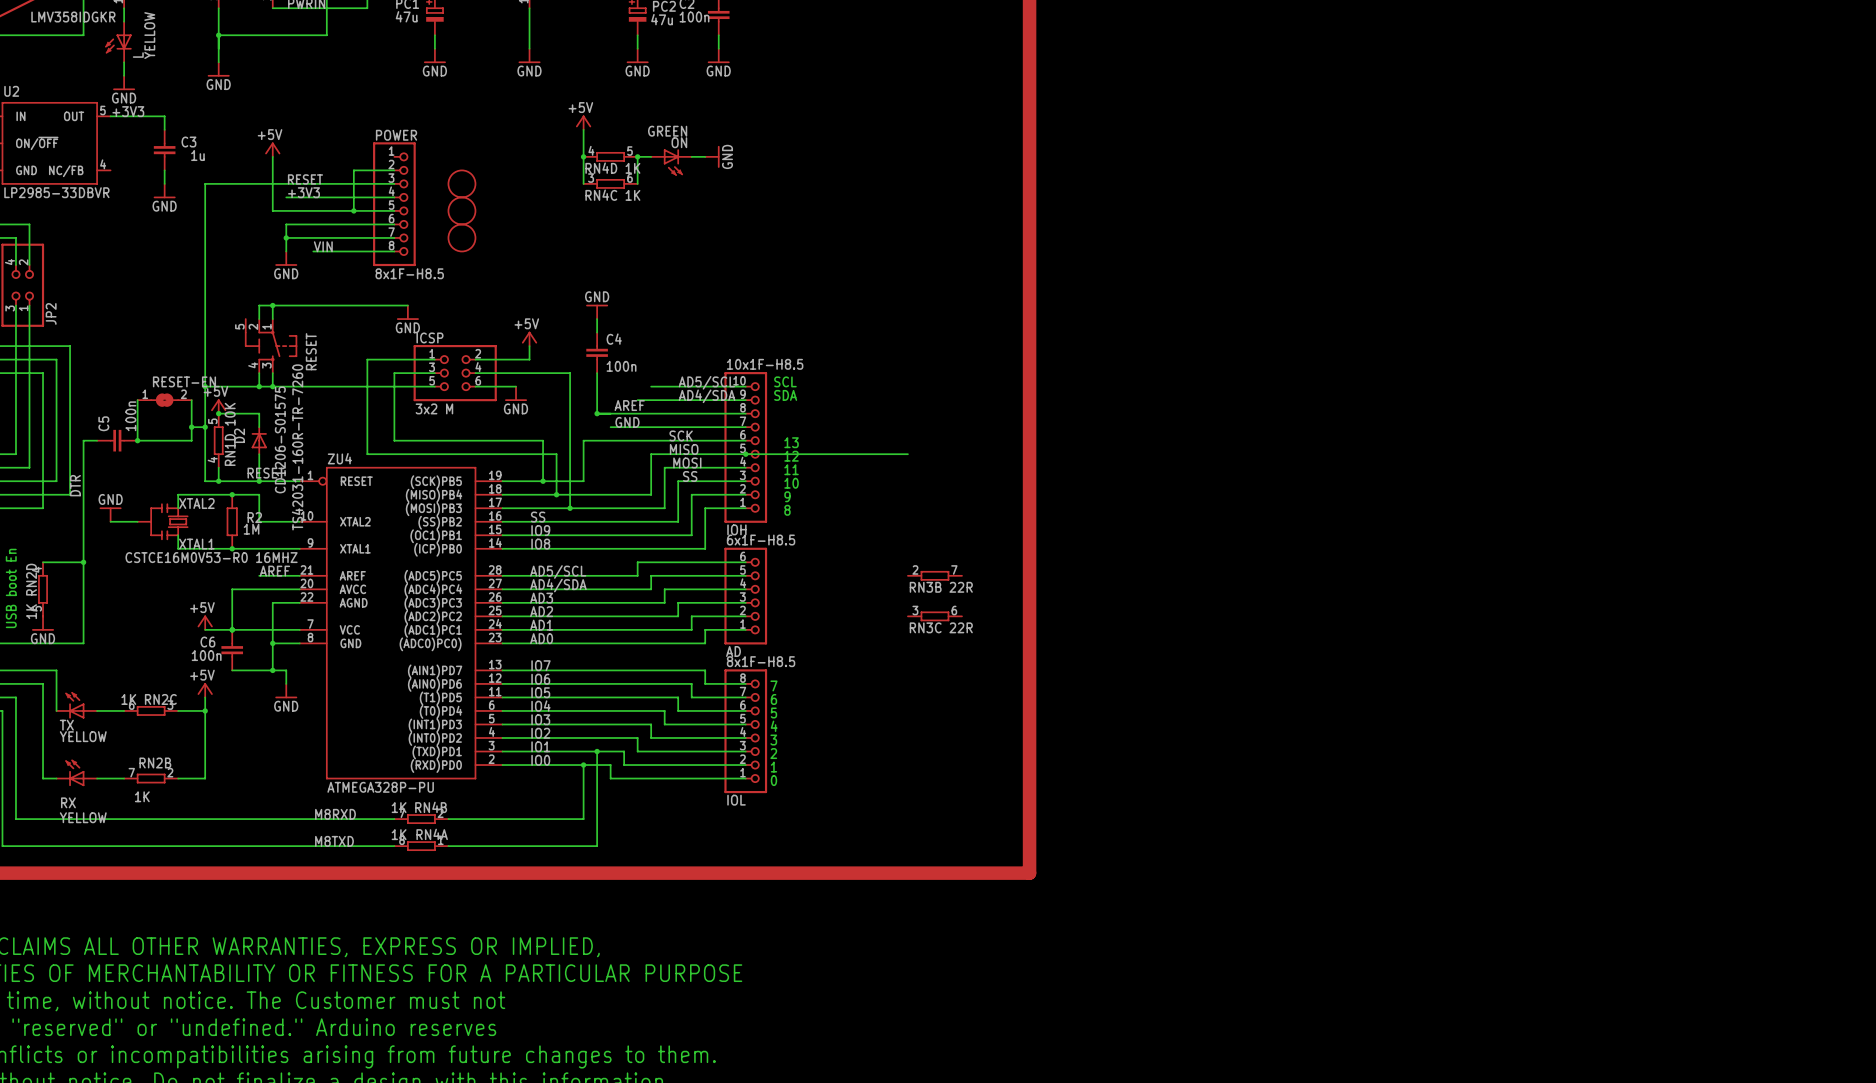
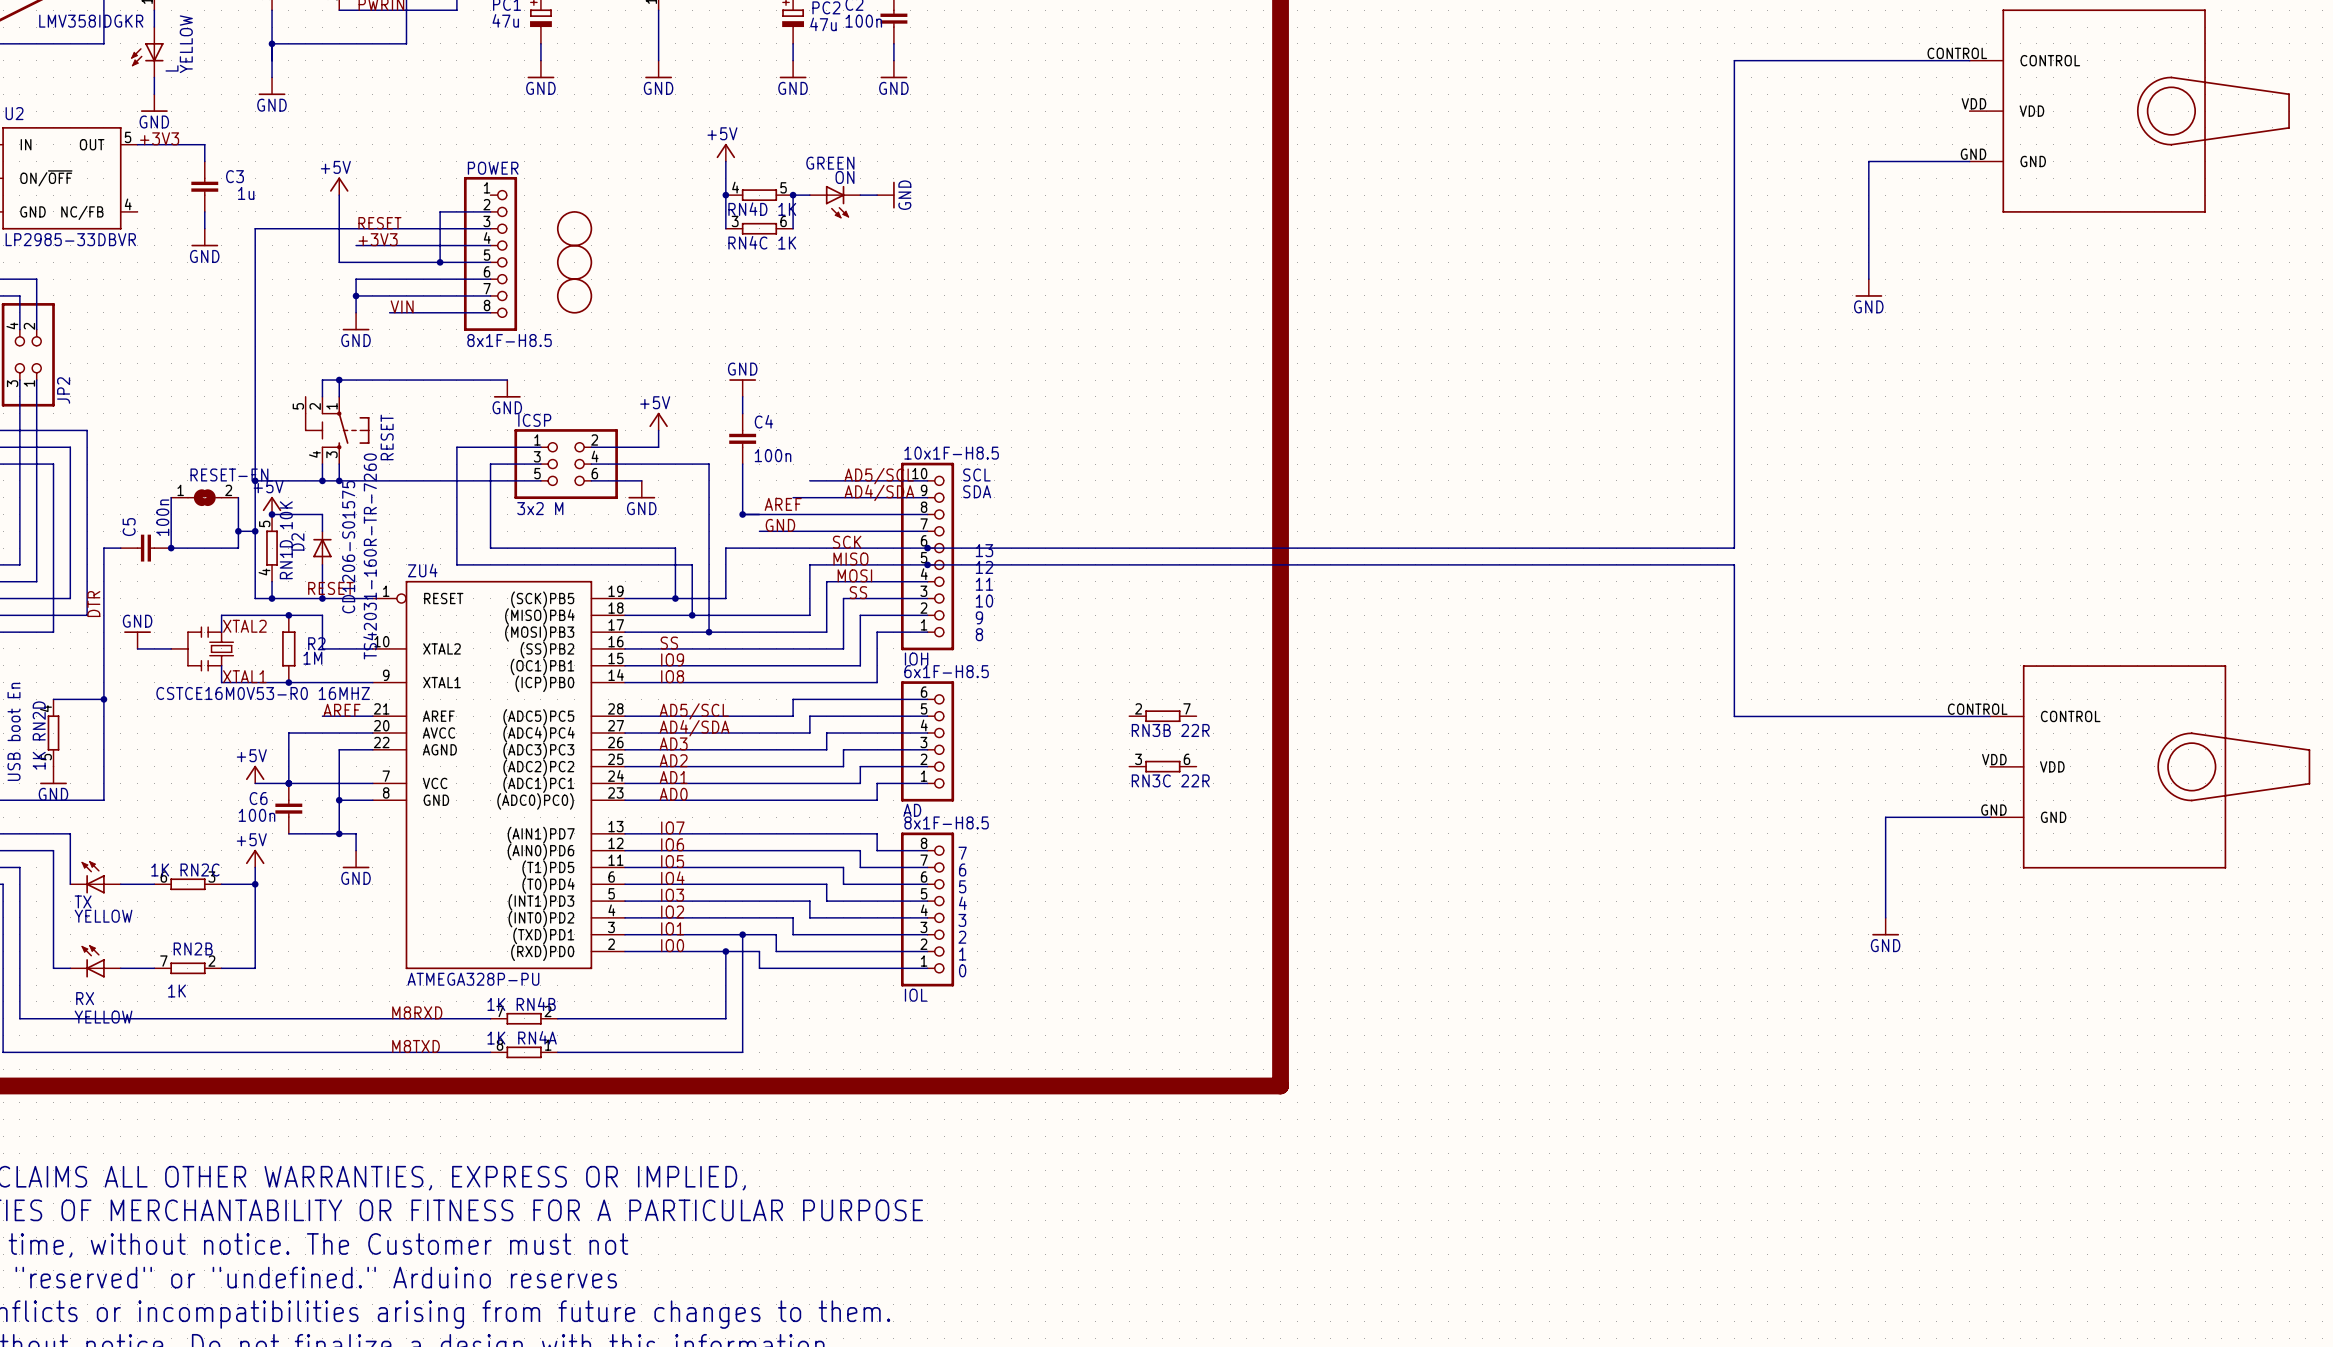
wire: none -> (1969, 60) (1734, 60) (1734, 548) (927, 548)
part: none -> (2129, 111)
wire: none -> (1969, 161) (1868, 161) (1868, 279)
power symbol: none -> GND (1868, 287)
junction: none -> (927, 548)
wire: none -> (1129, 564) (1734, 564) (1734, 716) (1990, 716)
part: none -> (2150, 766)
wire: none -> (1990, 817) (1885, 817) (1885, 917)
power symbol: none -> GND (1885, 926)

